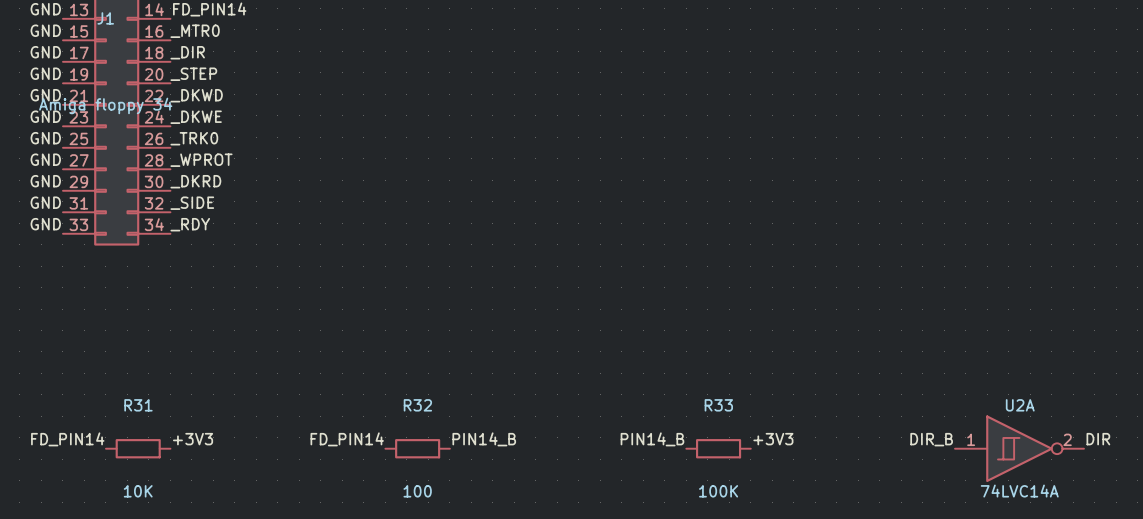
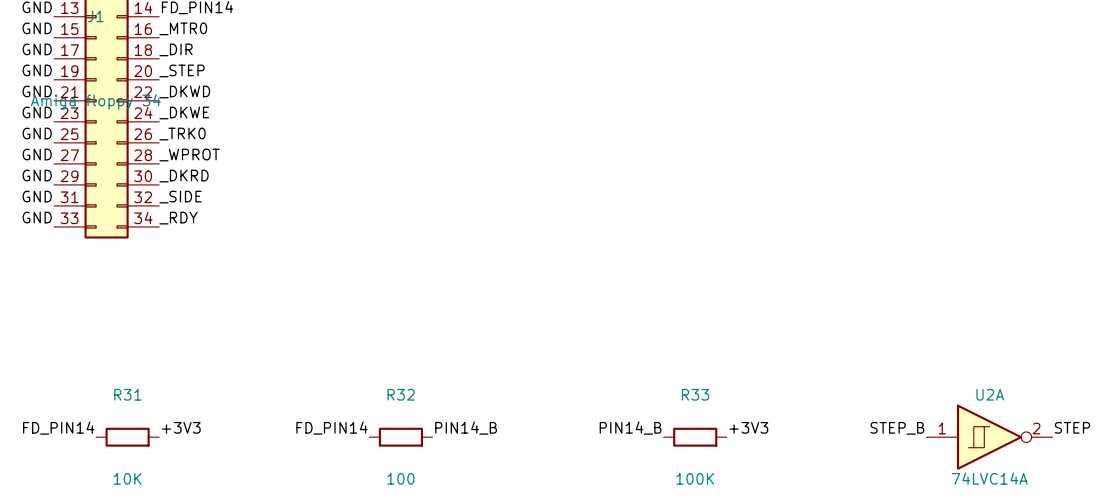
label: DIR_B (931, 439) -> STEP_B (897, 428)
label: DIR (1098, 439) -> STEP (1072, 427)

